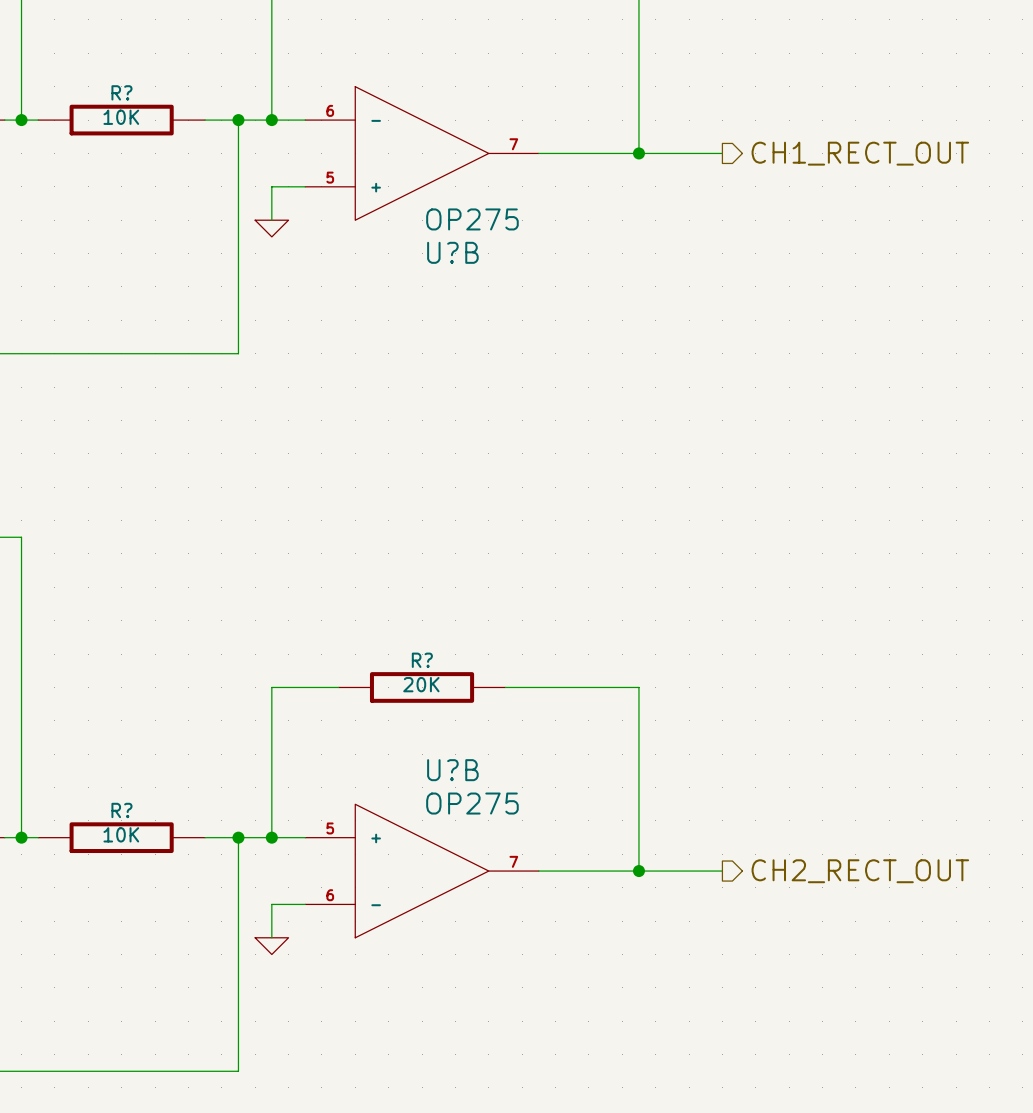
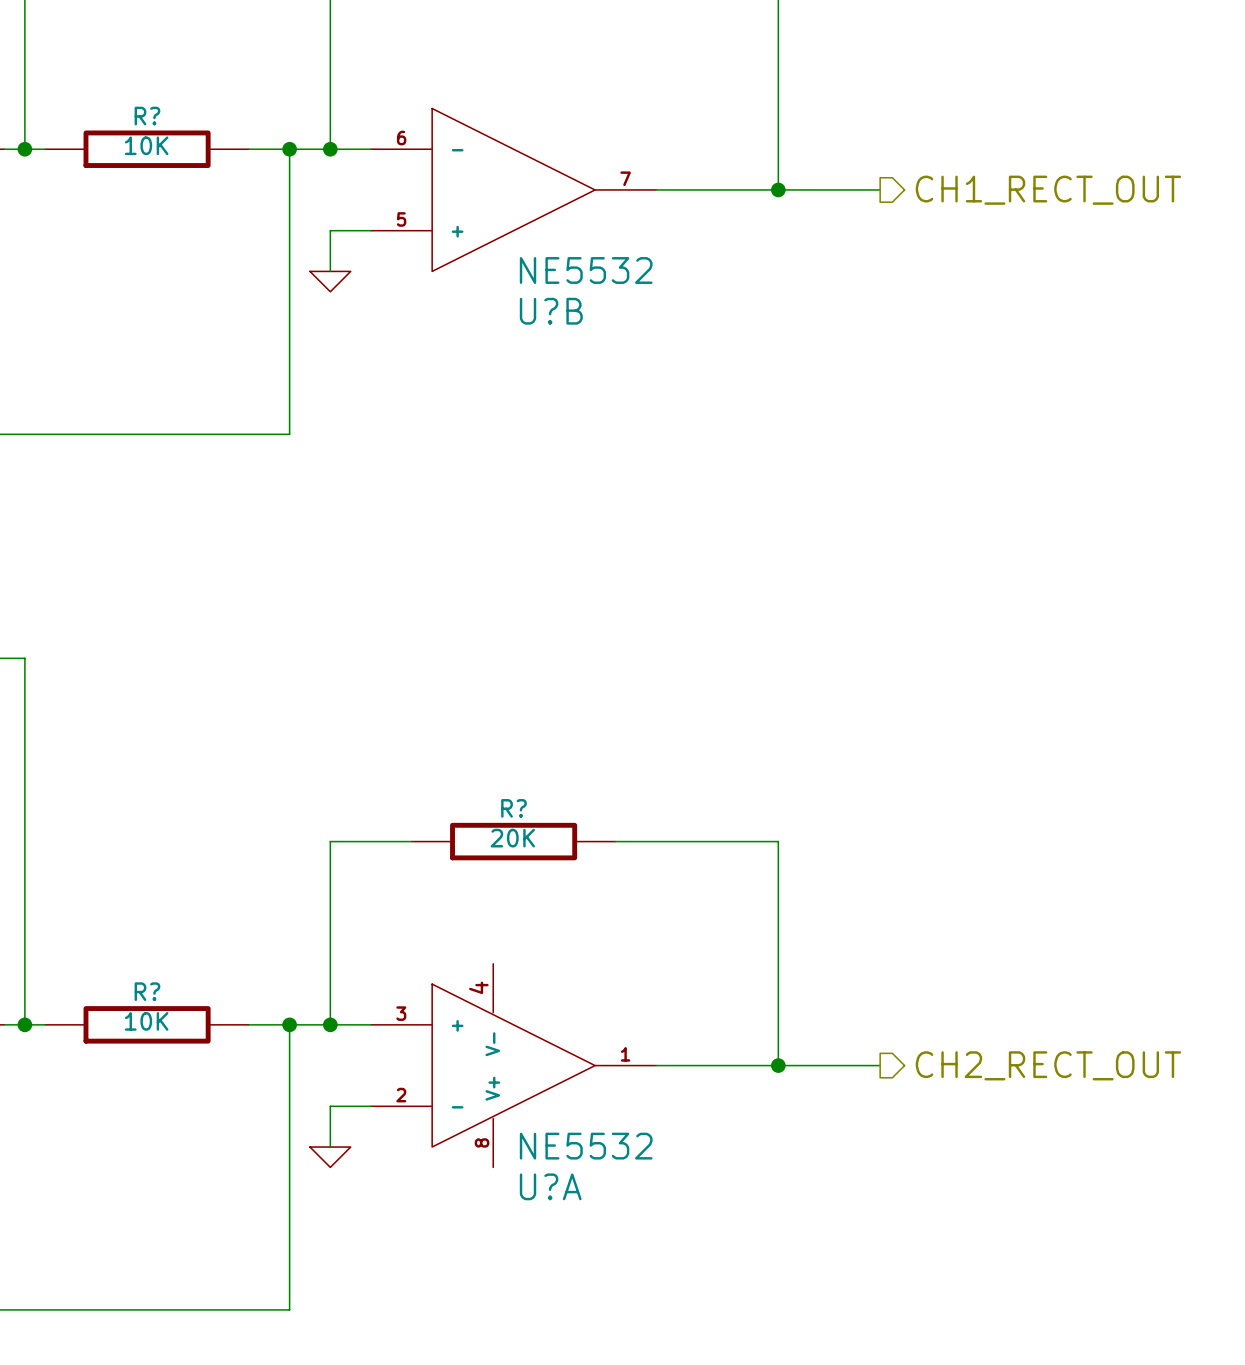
U?B value: OP275 (472, 219) -> NE5532 (586, 270)
U?B: OP275 (422, 871) -> none
U?A: none -> NE5532 (513, 1065)

